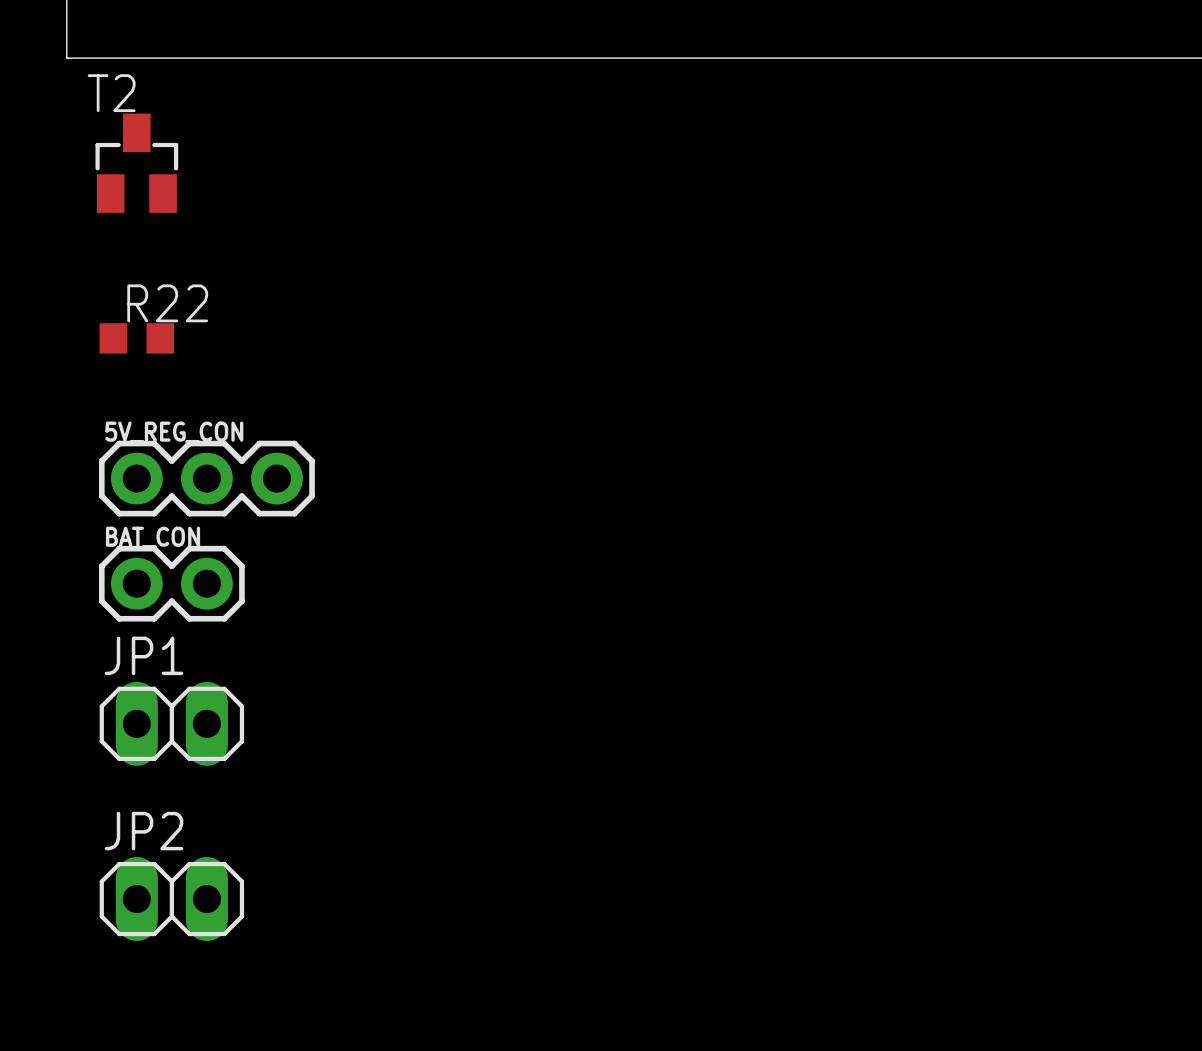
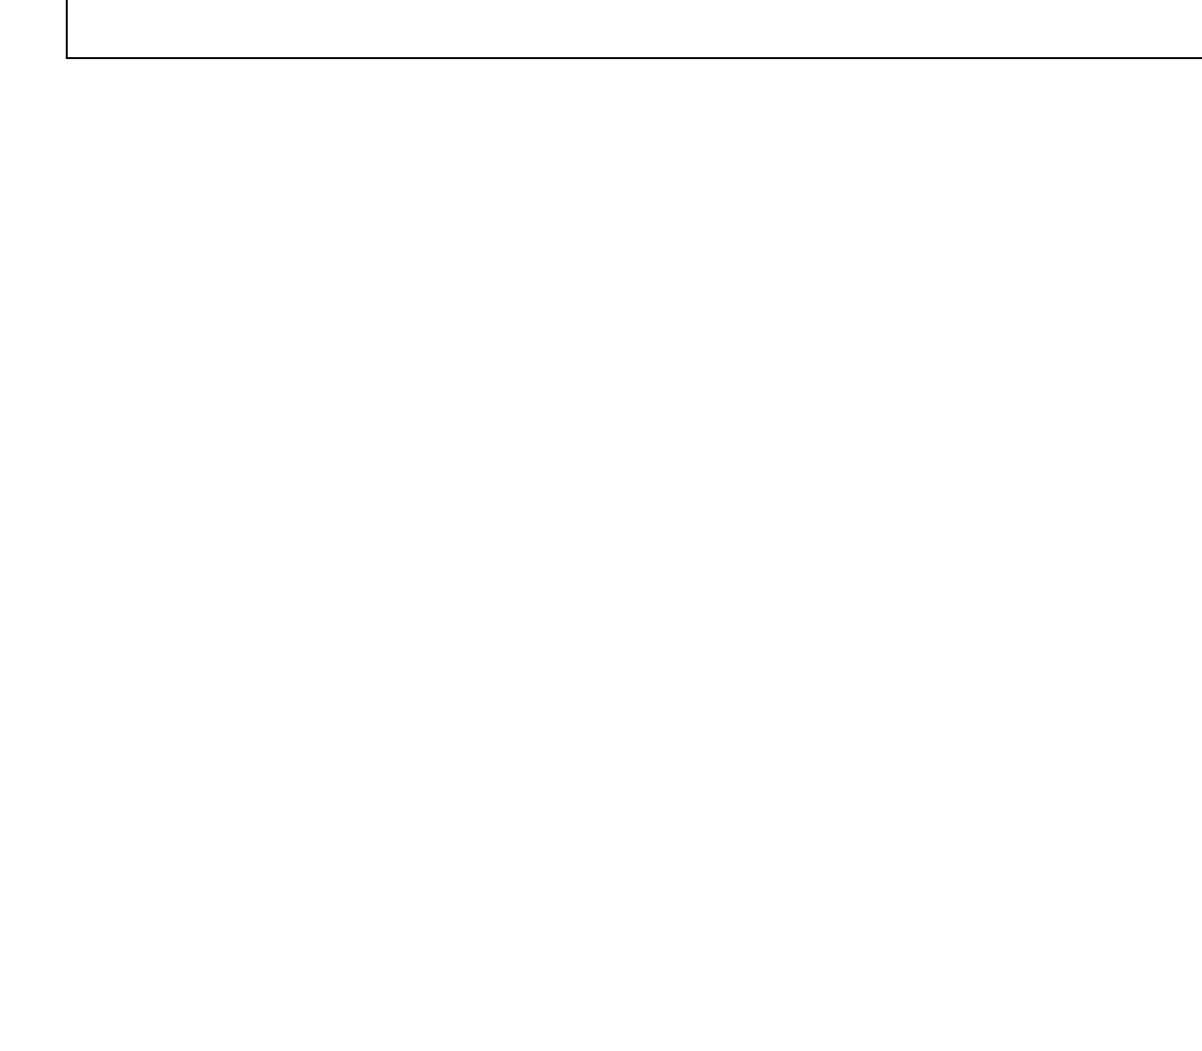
T2: (136, 163) -> none
R22: (136, 338) -> none
5V_REG_CON: (206, 478) -> none
BAT_CON: (171, 583) -> none
JP1: (171, 723) -> none
JP2: (171, 899) -> none

